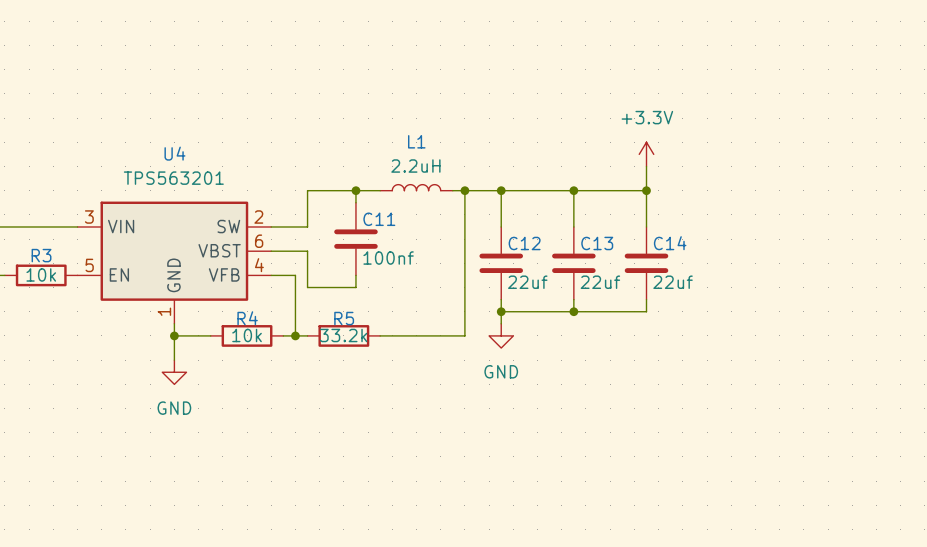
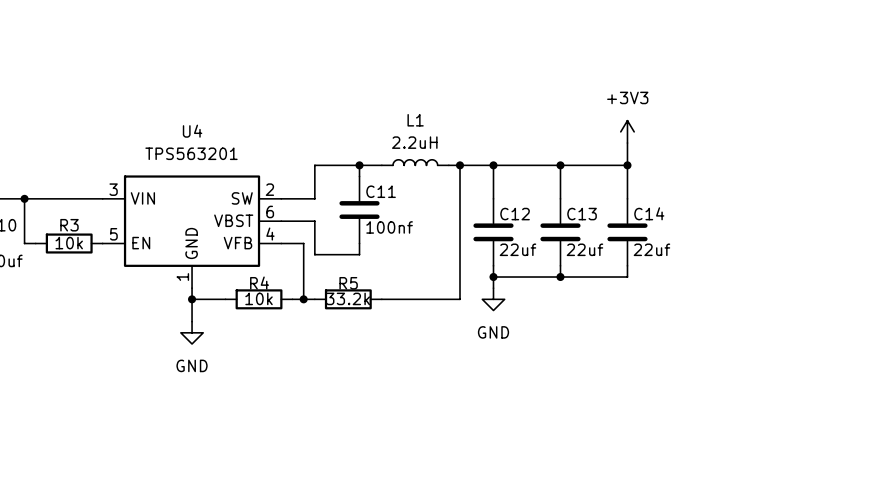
power symbol: +3.3V (646, 154) -> +3V3 (627, 131)

